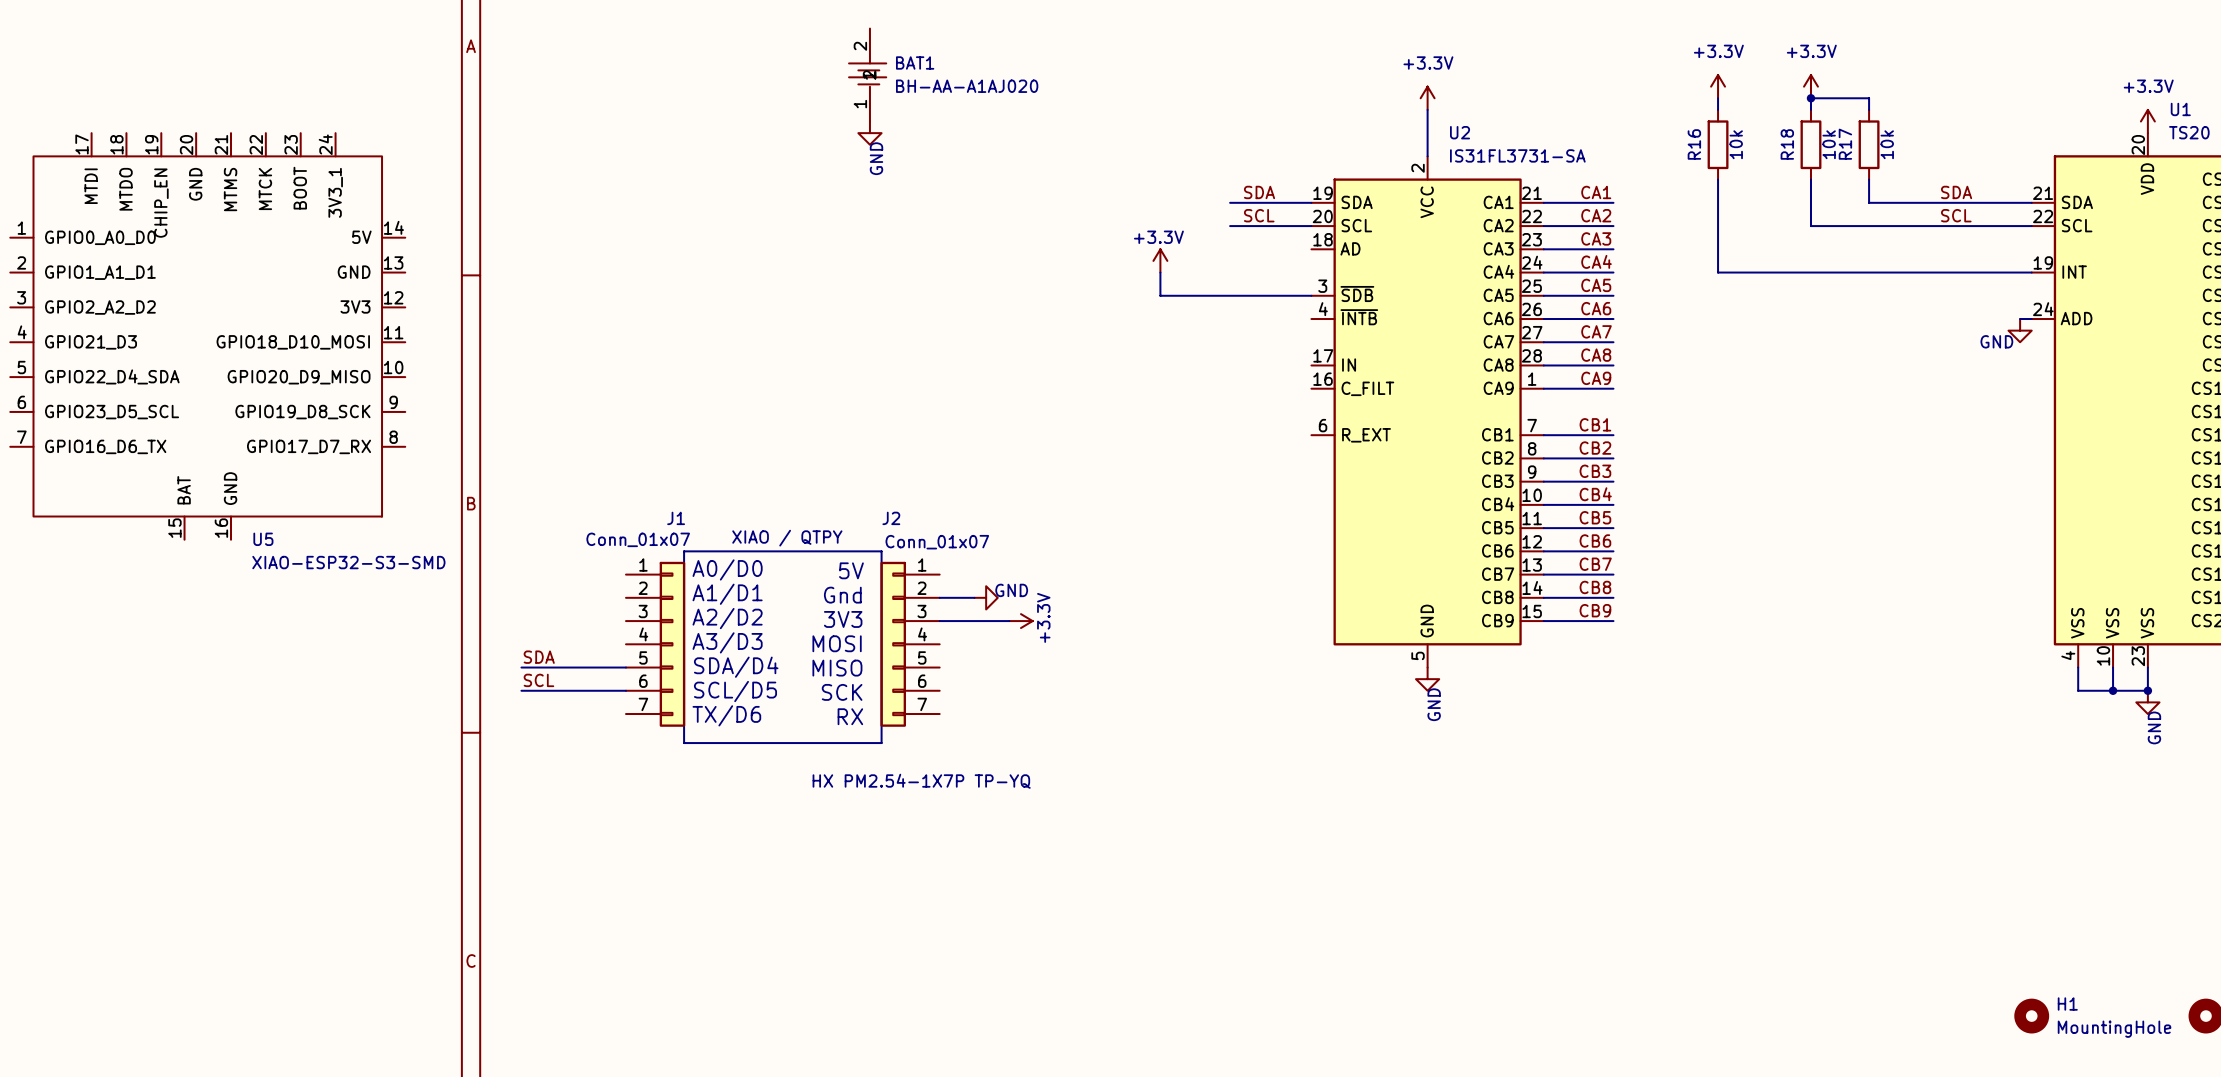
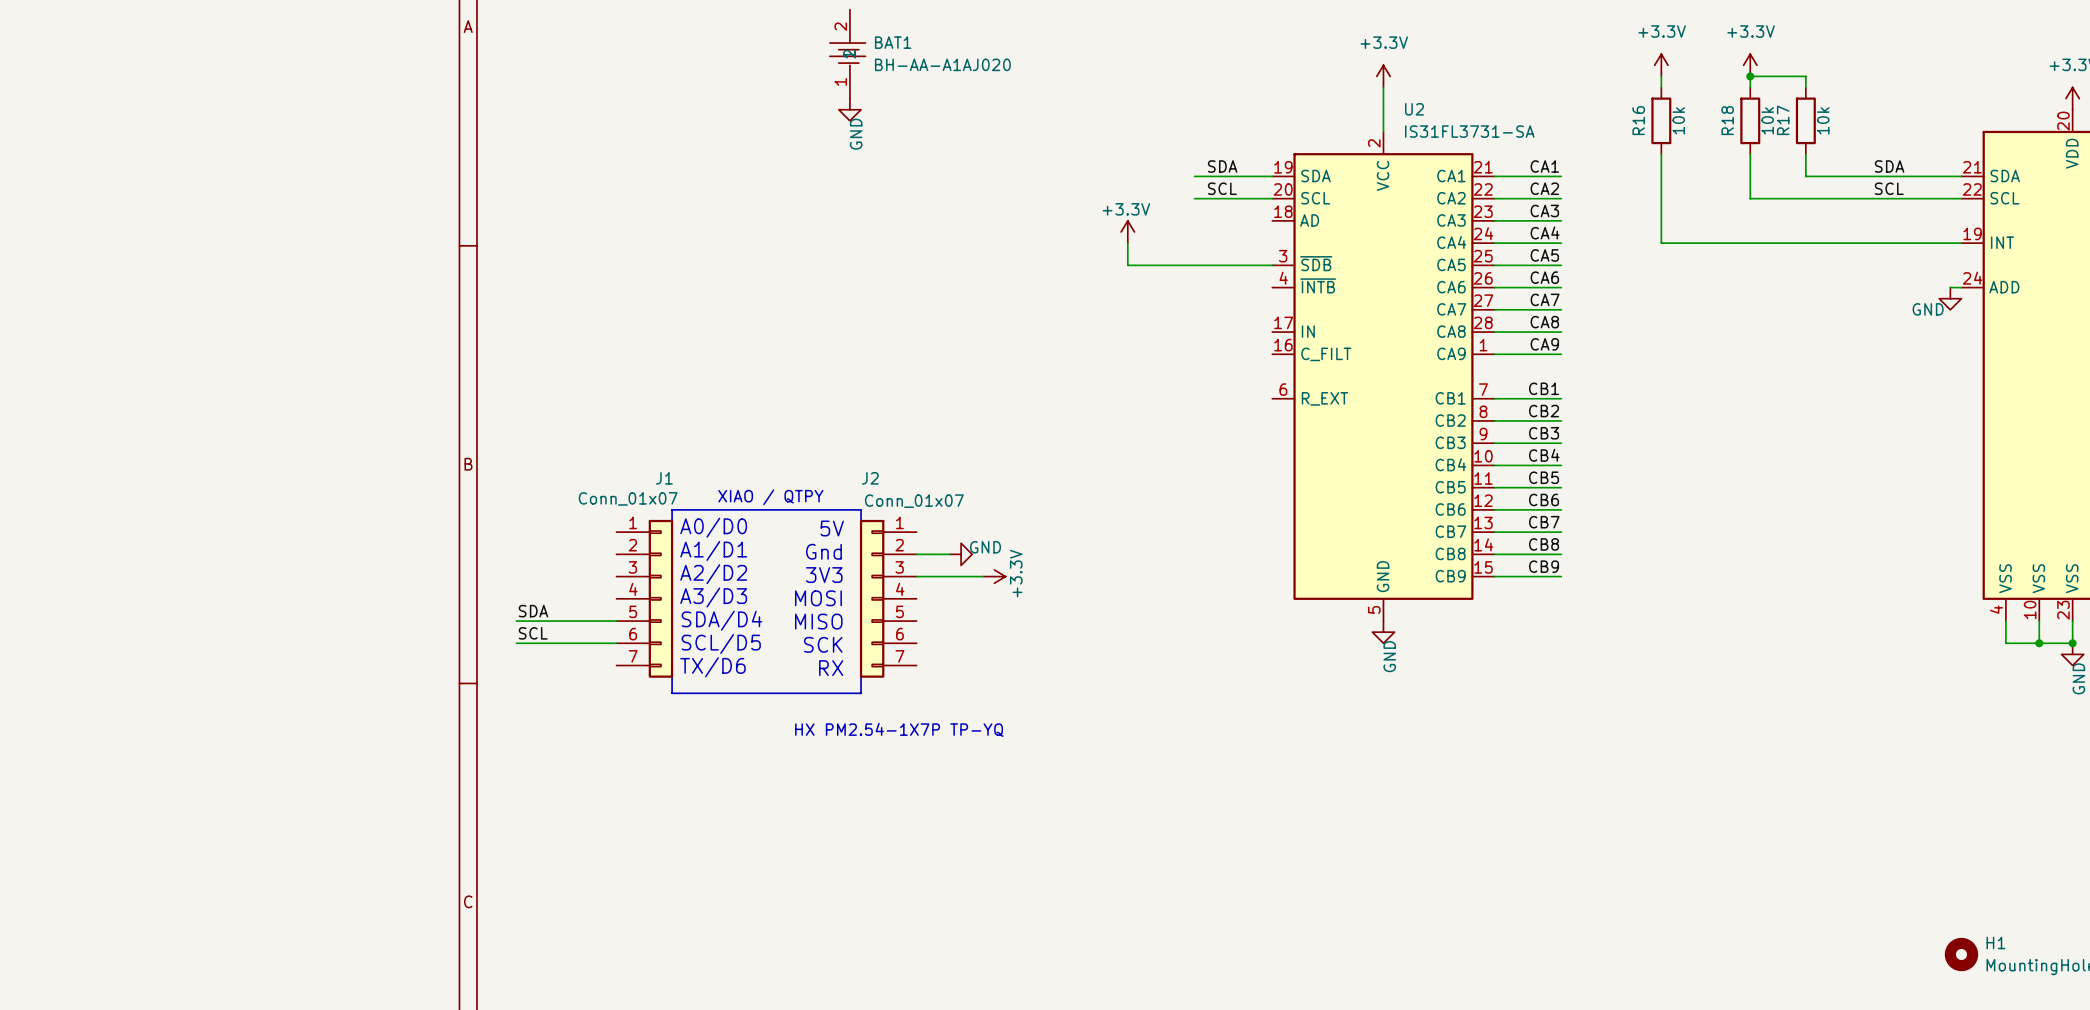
U5: XIAO-ESP32-S3-SMD (207, 336) -> none

